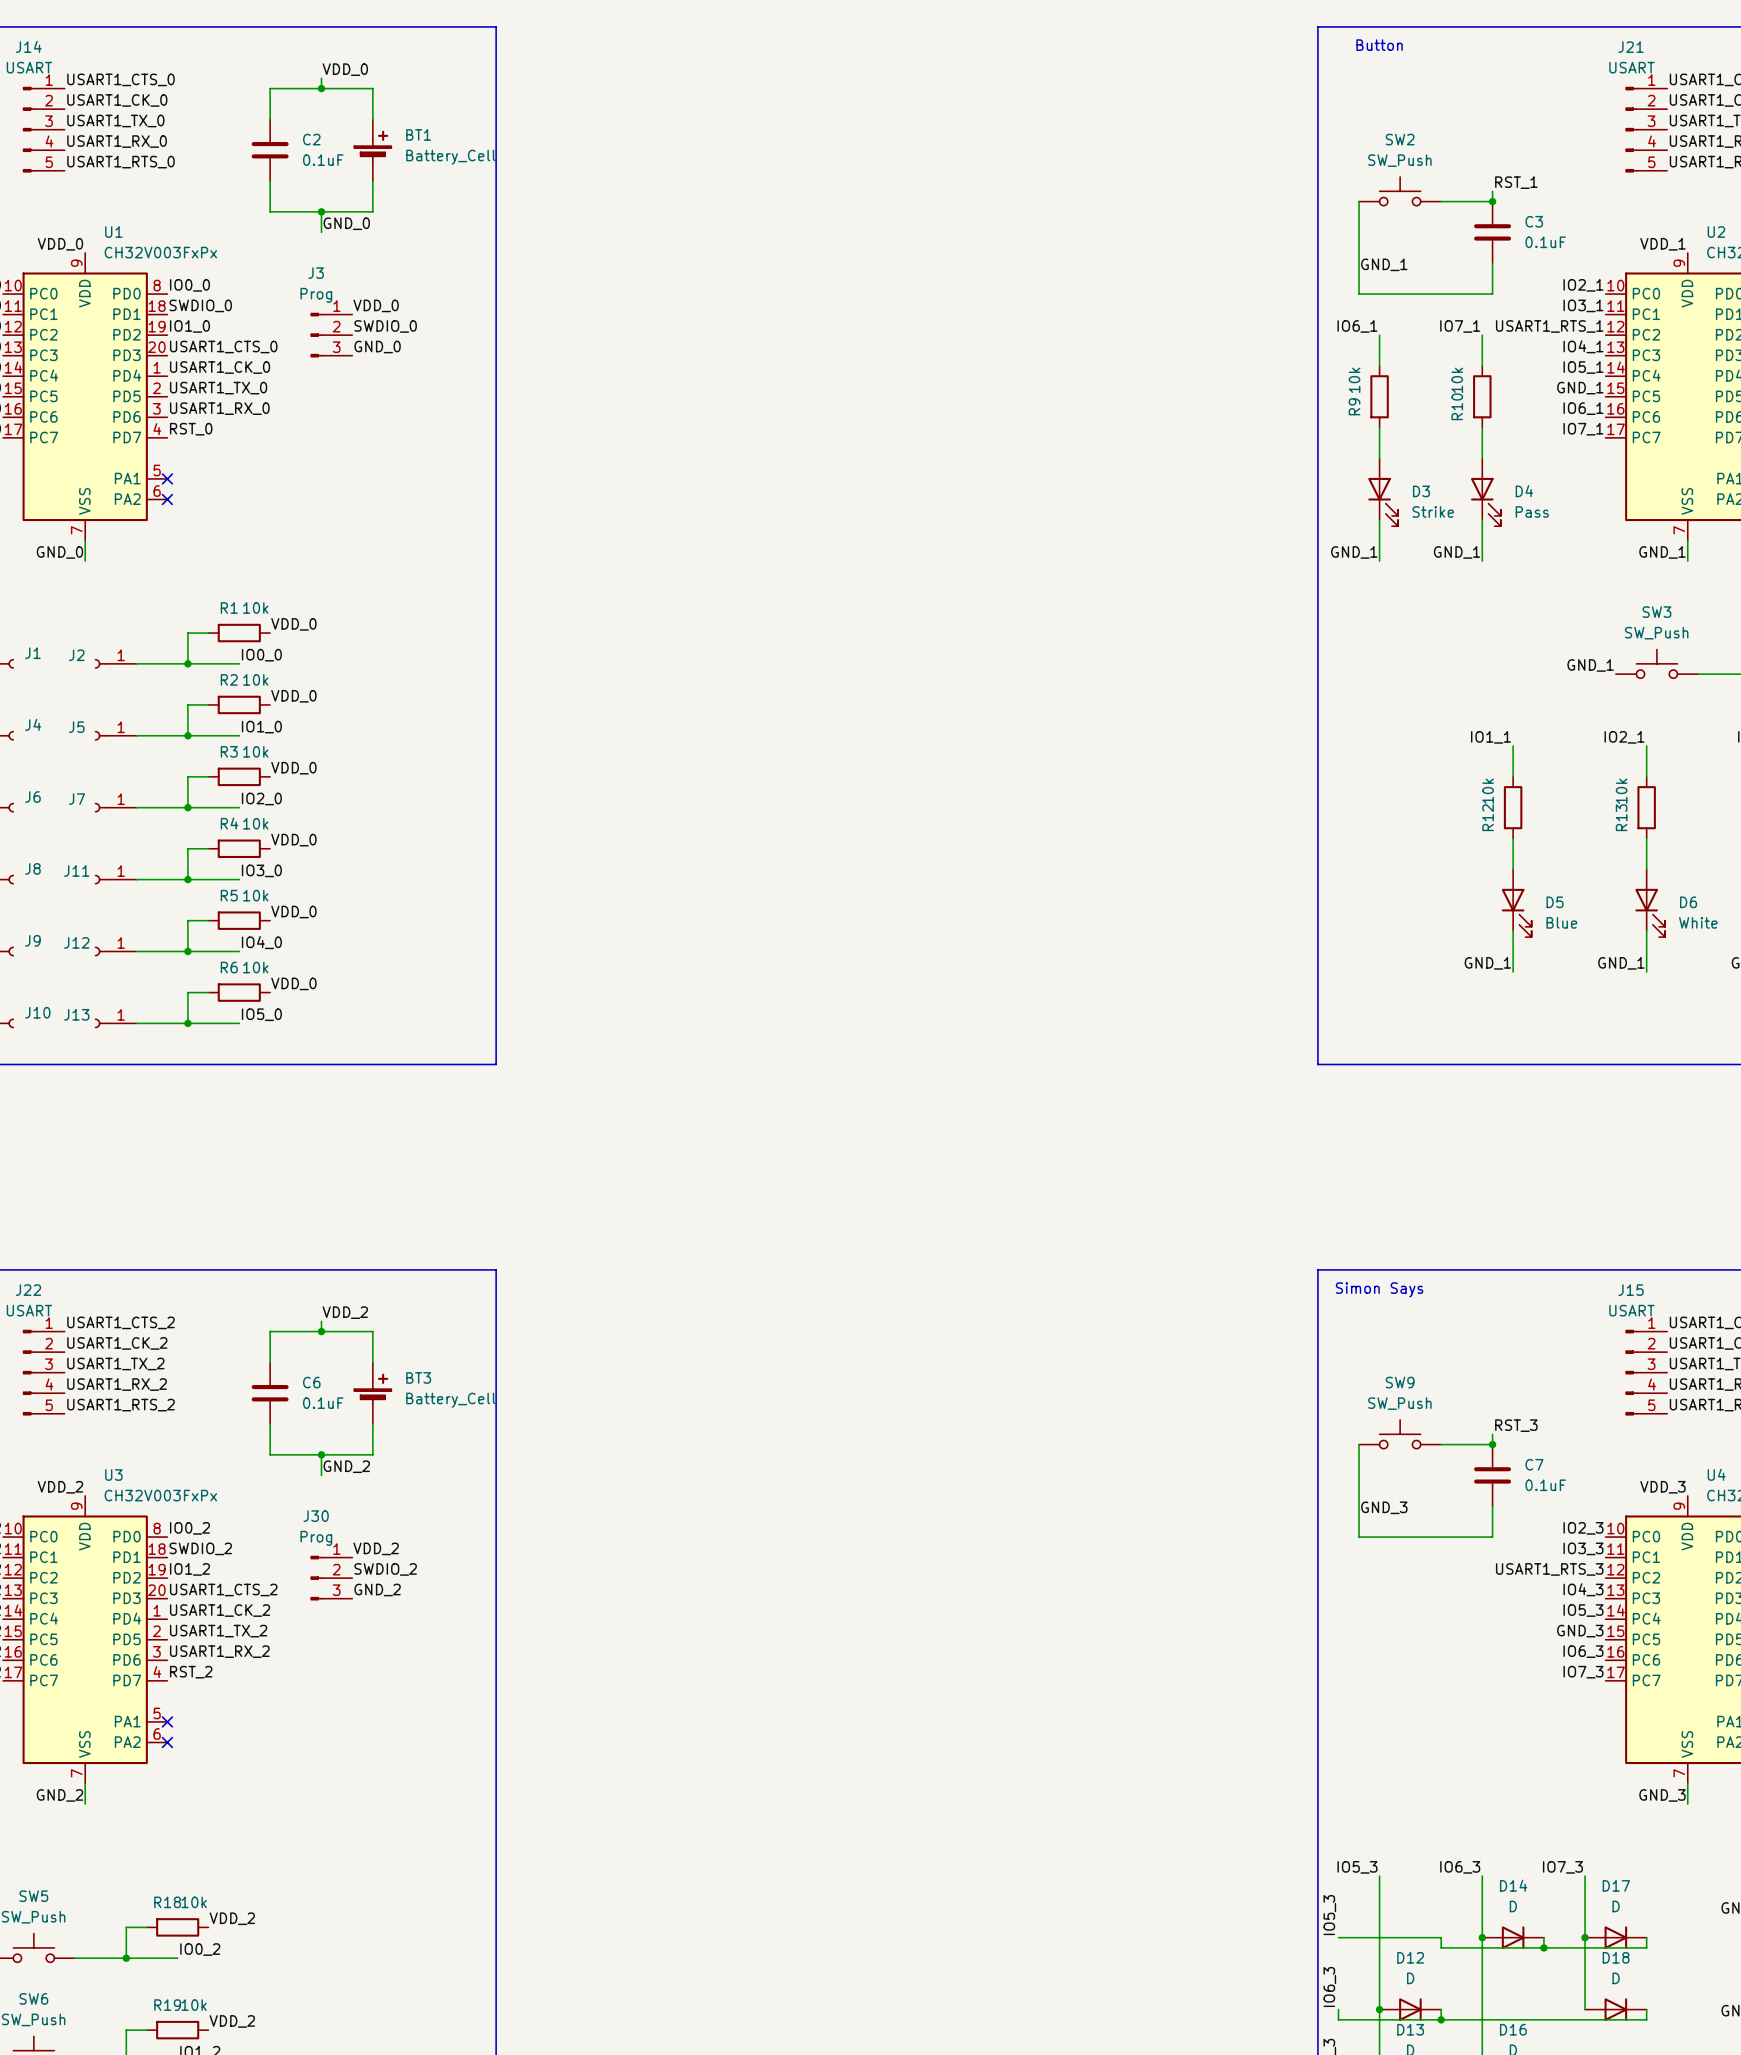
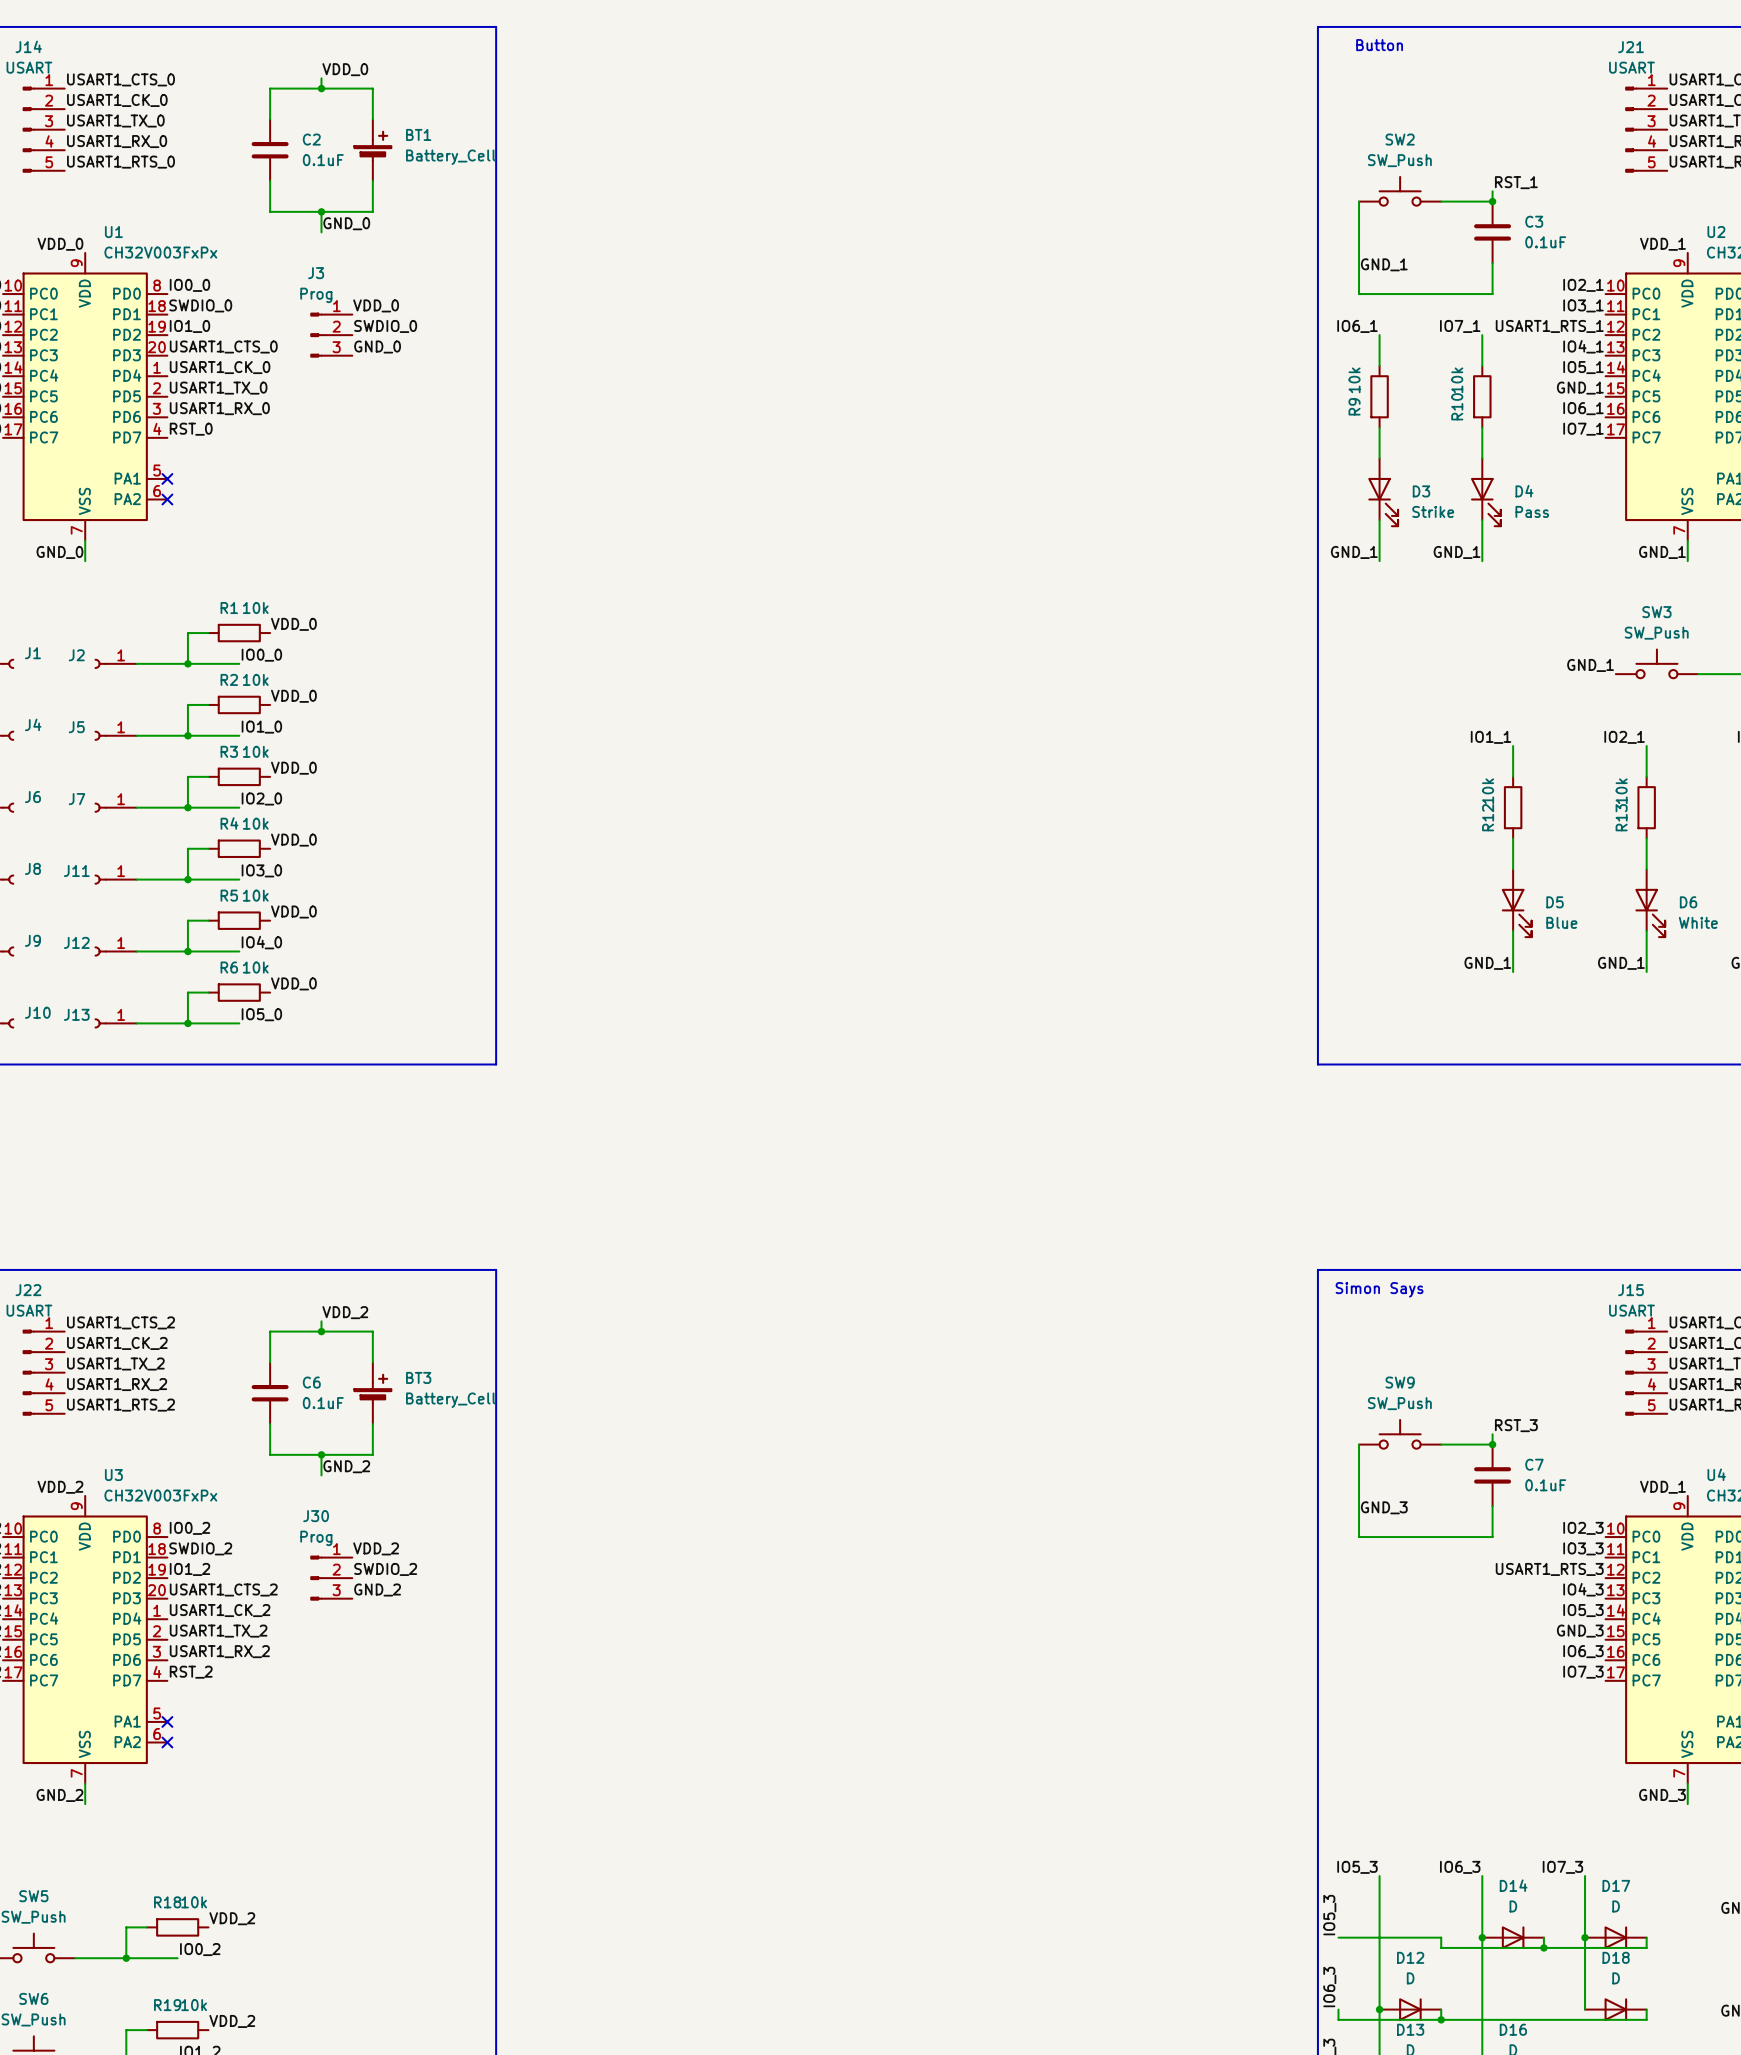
label: VDD_3 (1662, 1487) -> VDD_1 (1662, 1487)

